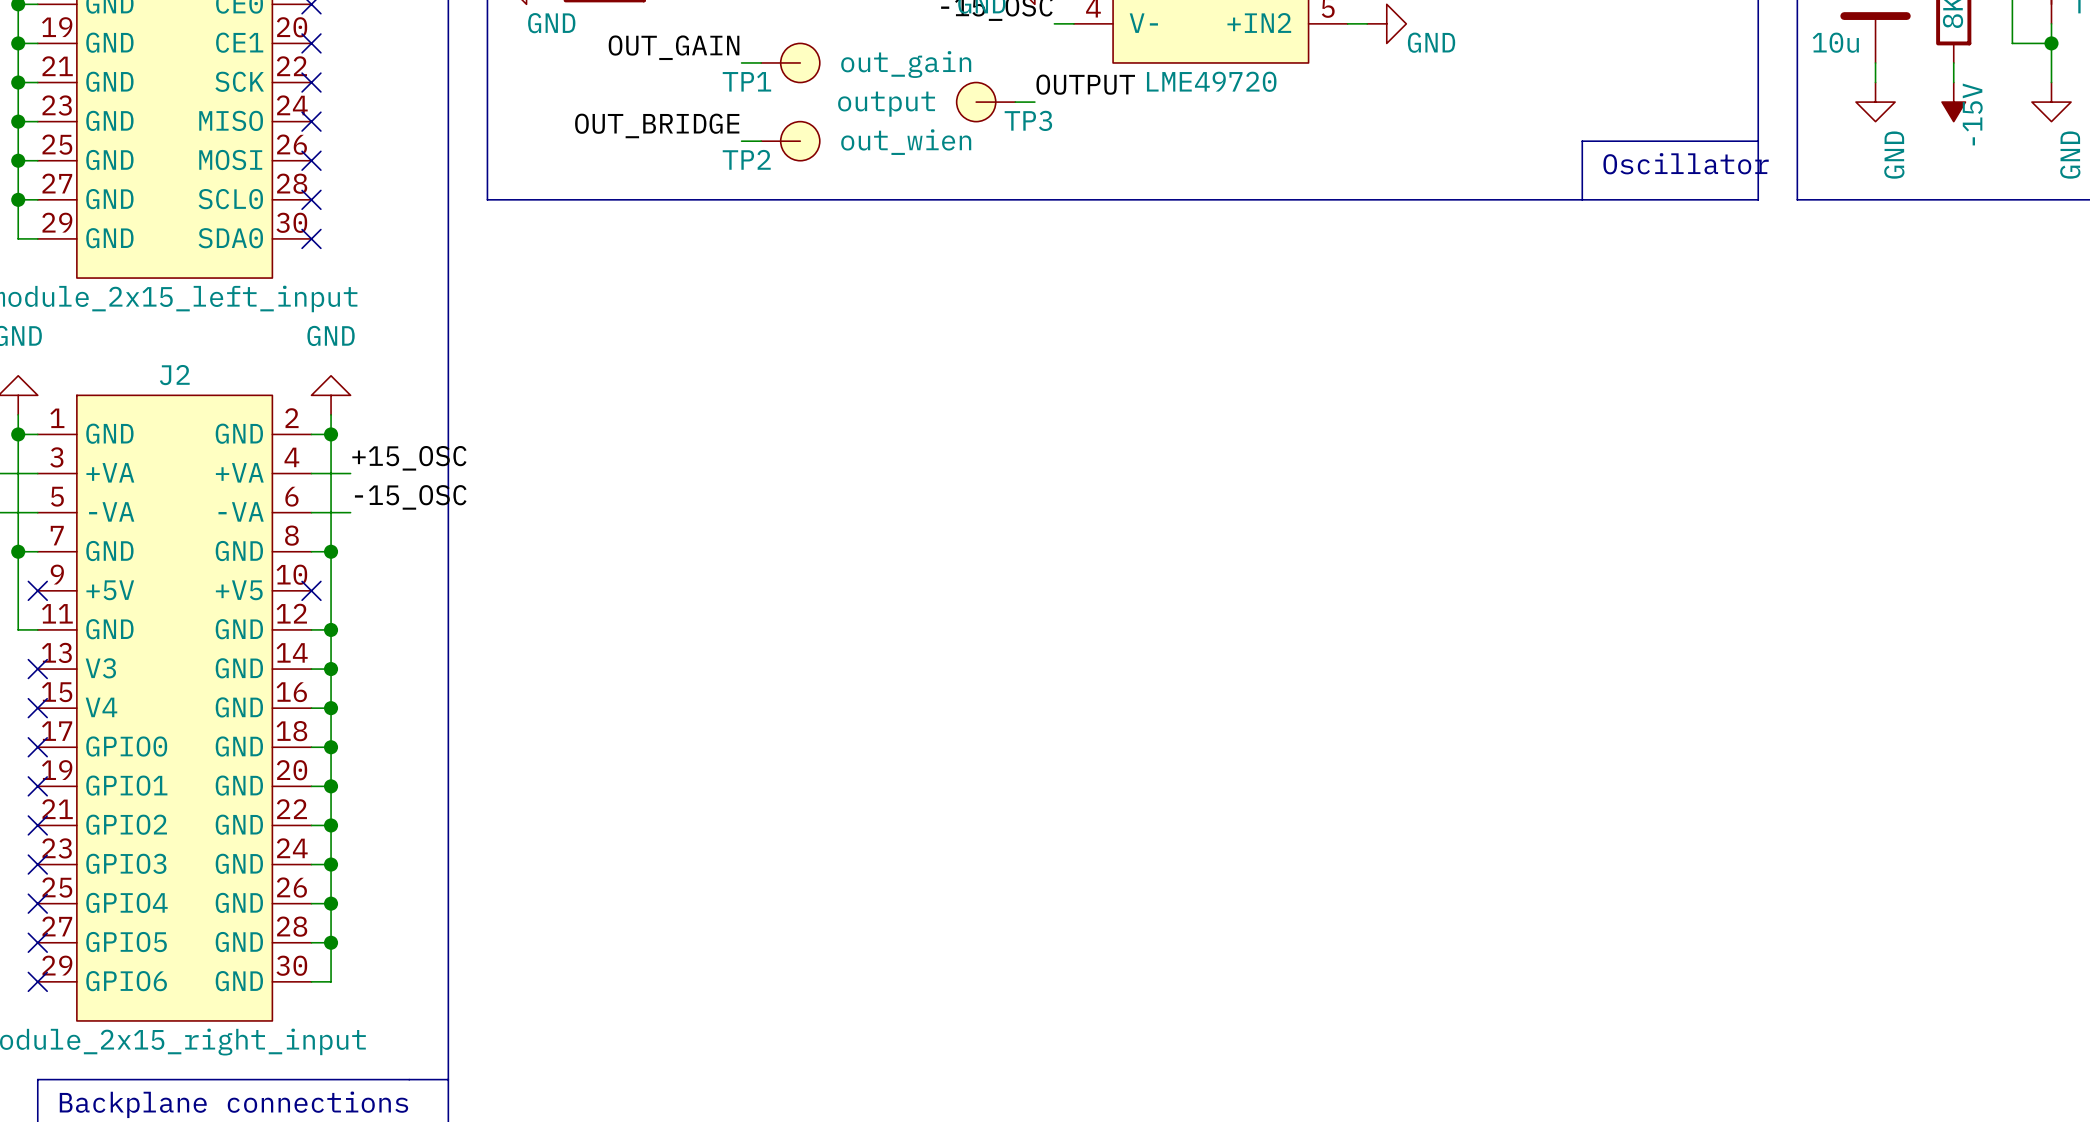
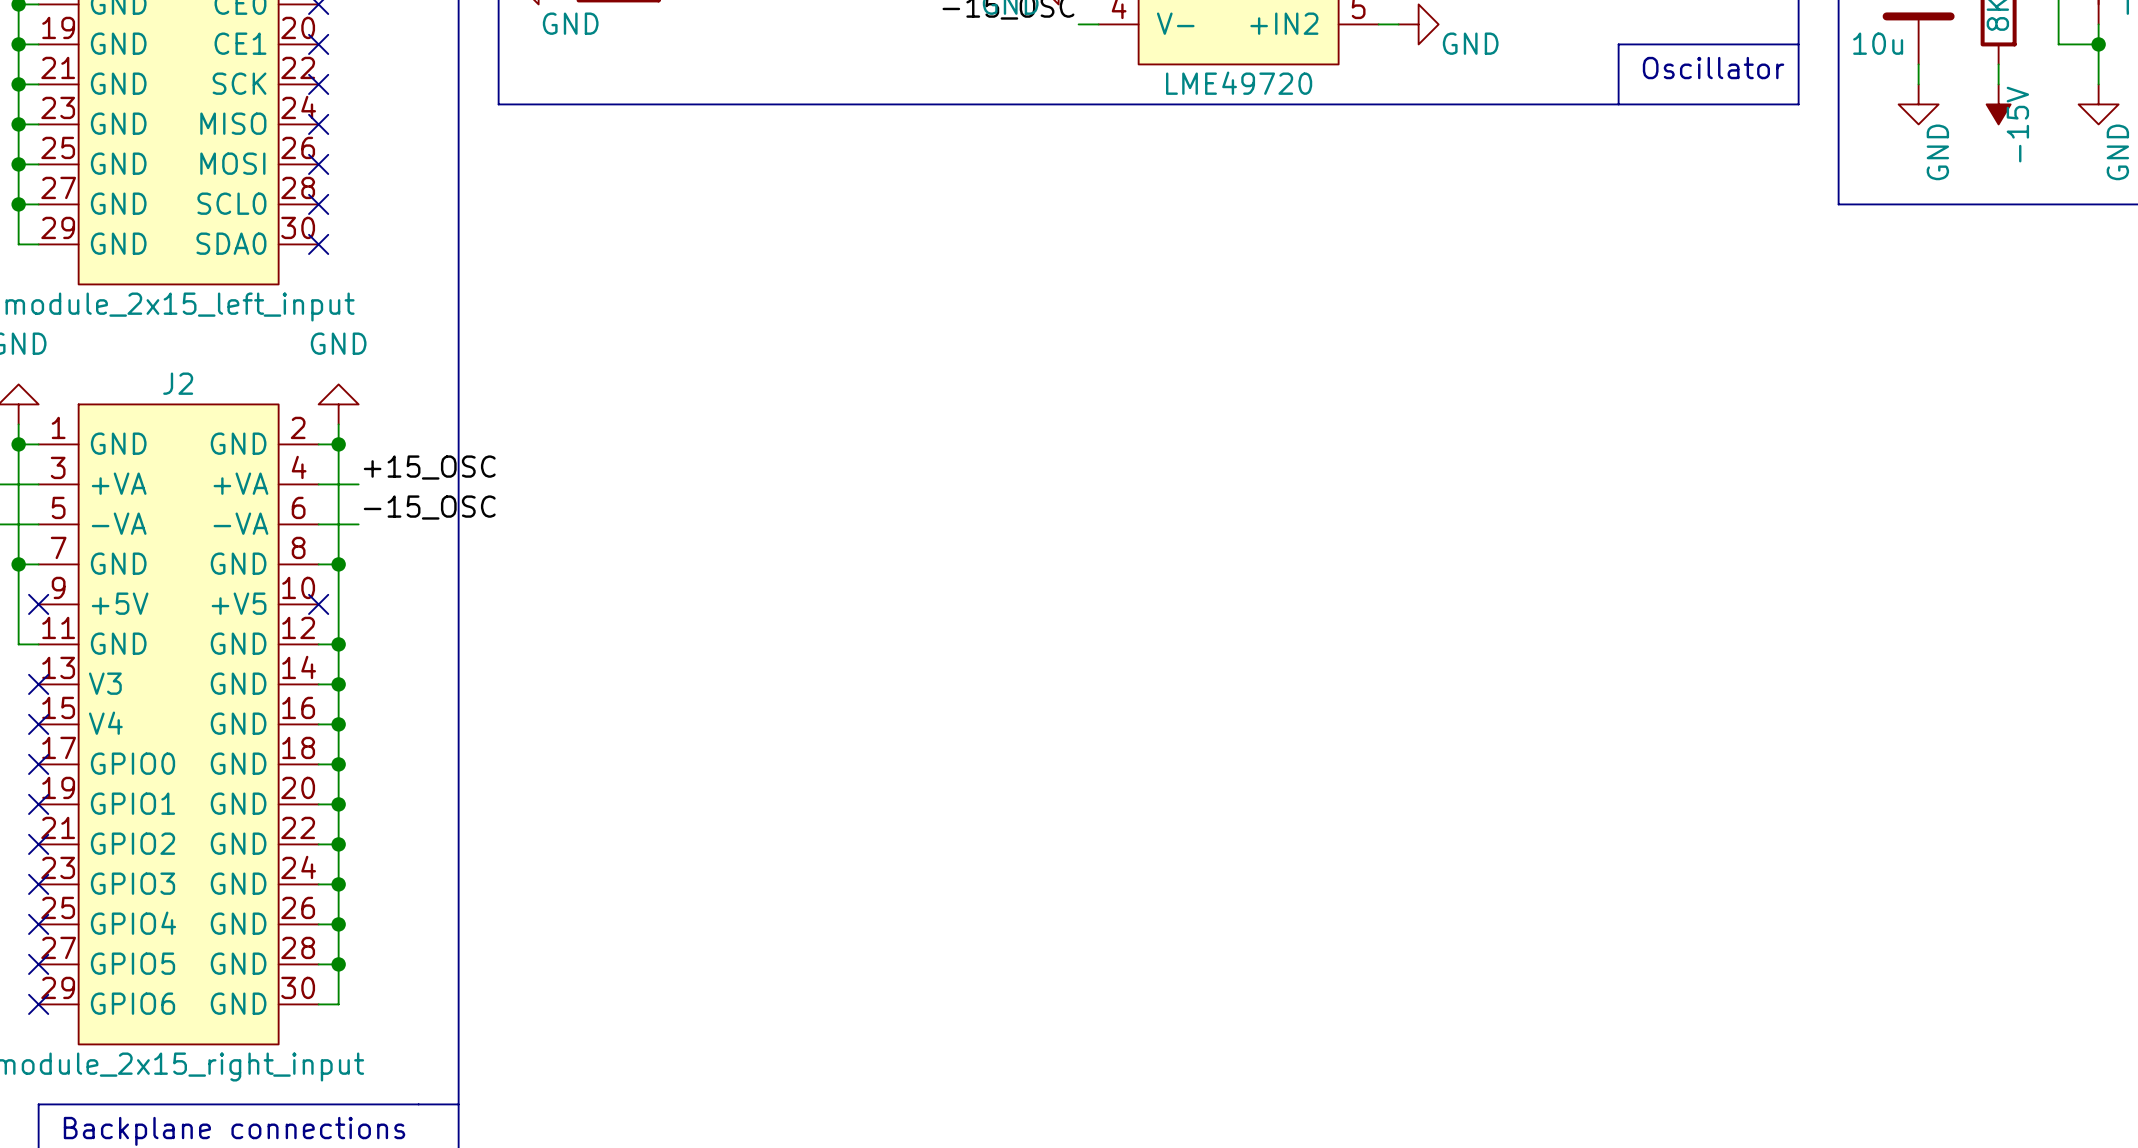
label: OUT_GAIN (674, 47) -> none
wire: (741, 62) (761, 62) -> none
TP1: out_gain (790, 62) -> none
label: OUTPUT (1085, 84) -> none
line: (487, 102) (487, 199) (1758, 199) (1758, 102) -> (498, 104) (1798, 104)
TP3: output (985, 102) -> none
label: OUT_BRIDGE (657, 125) -> none
wire: (741, 141) (761, 141) -> none
TP2: out_wien (790, 141) -> none
line: (1758, 141) (1582, 141) (1582, 199) -> (1798, 44) (1618, 44) (1618, 104)
text position: Oscillator (1686, 163) -> Oscillator (1713, 68)

